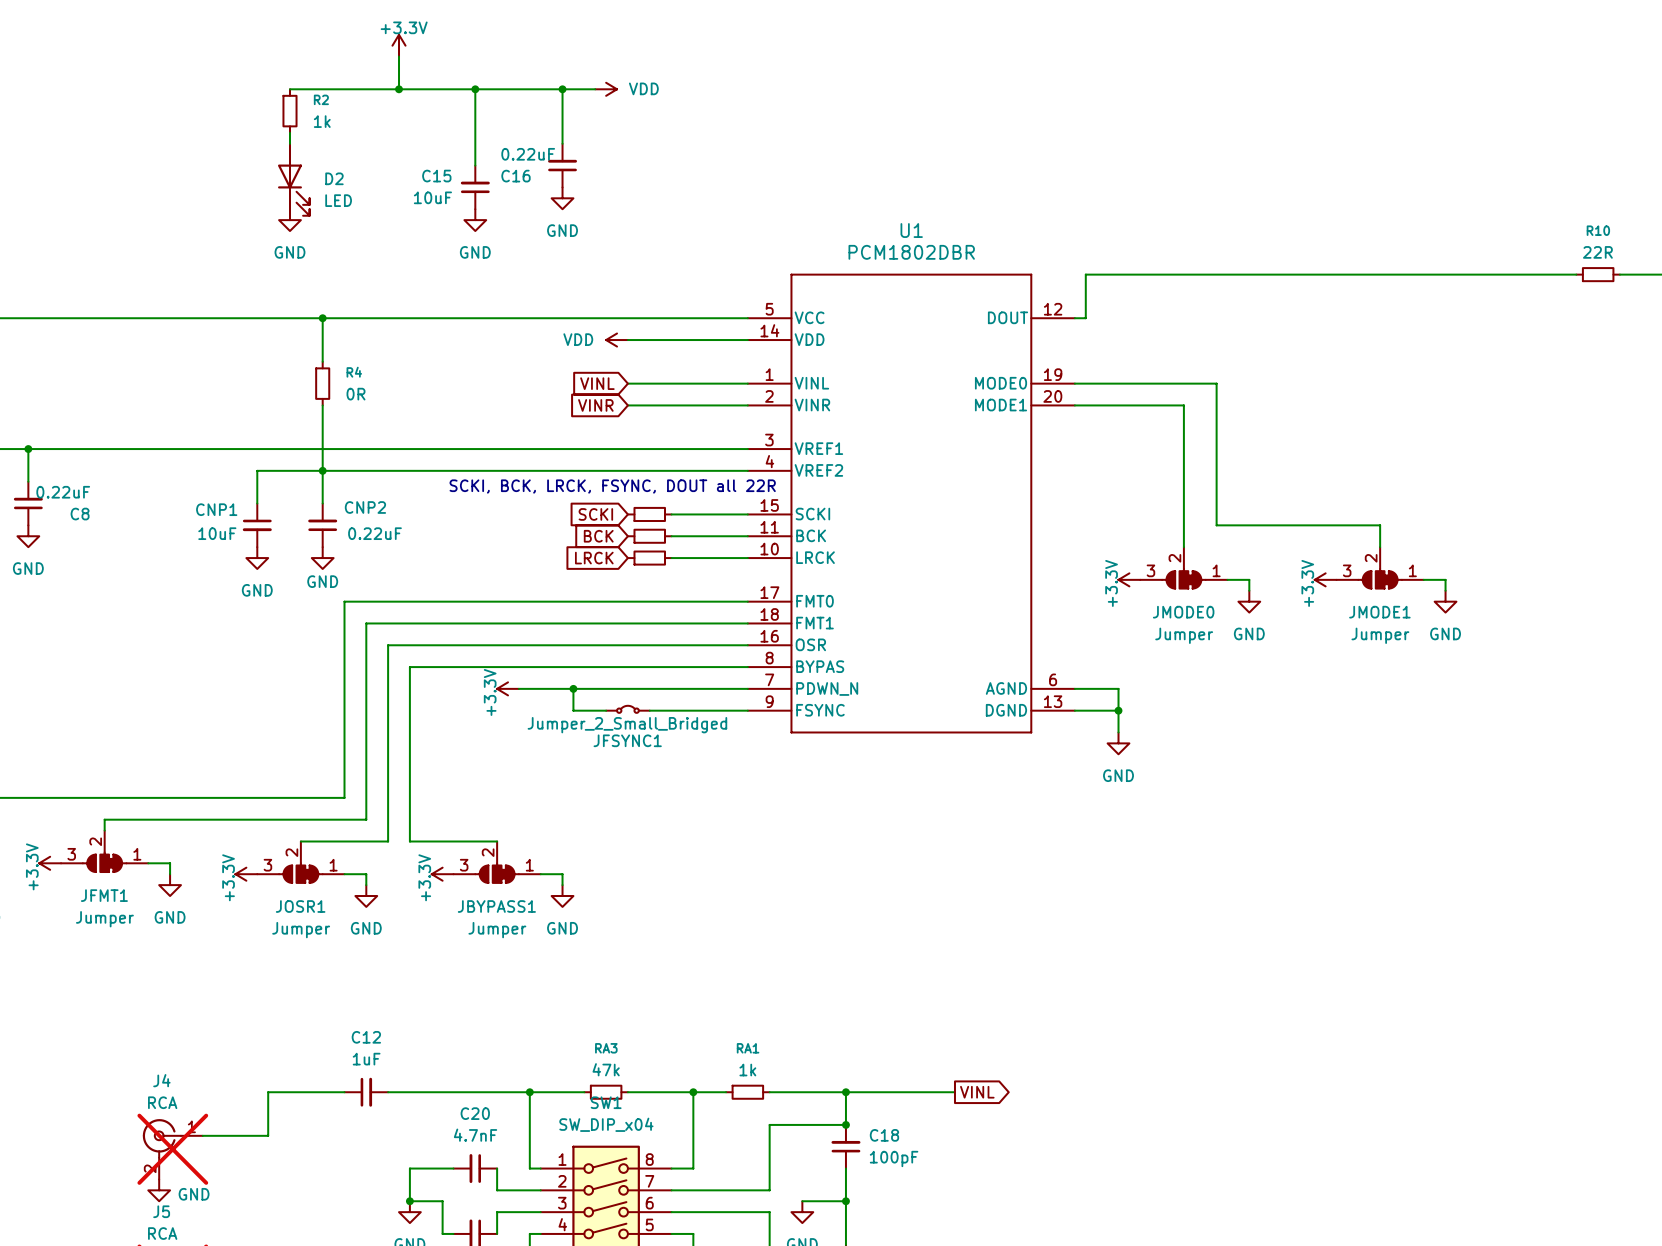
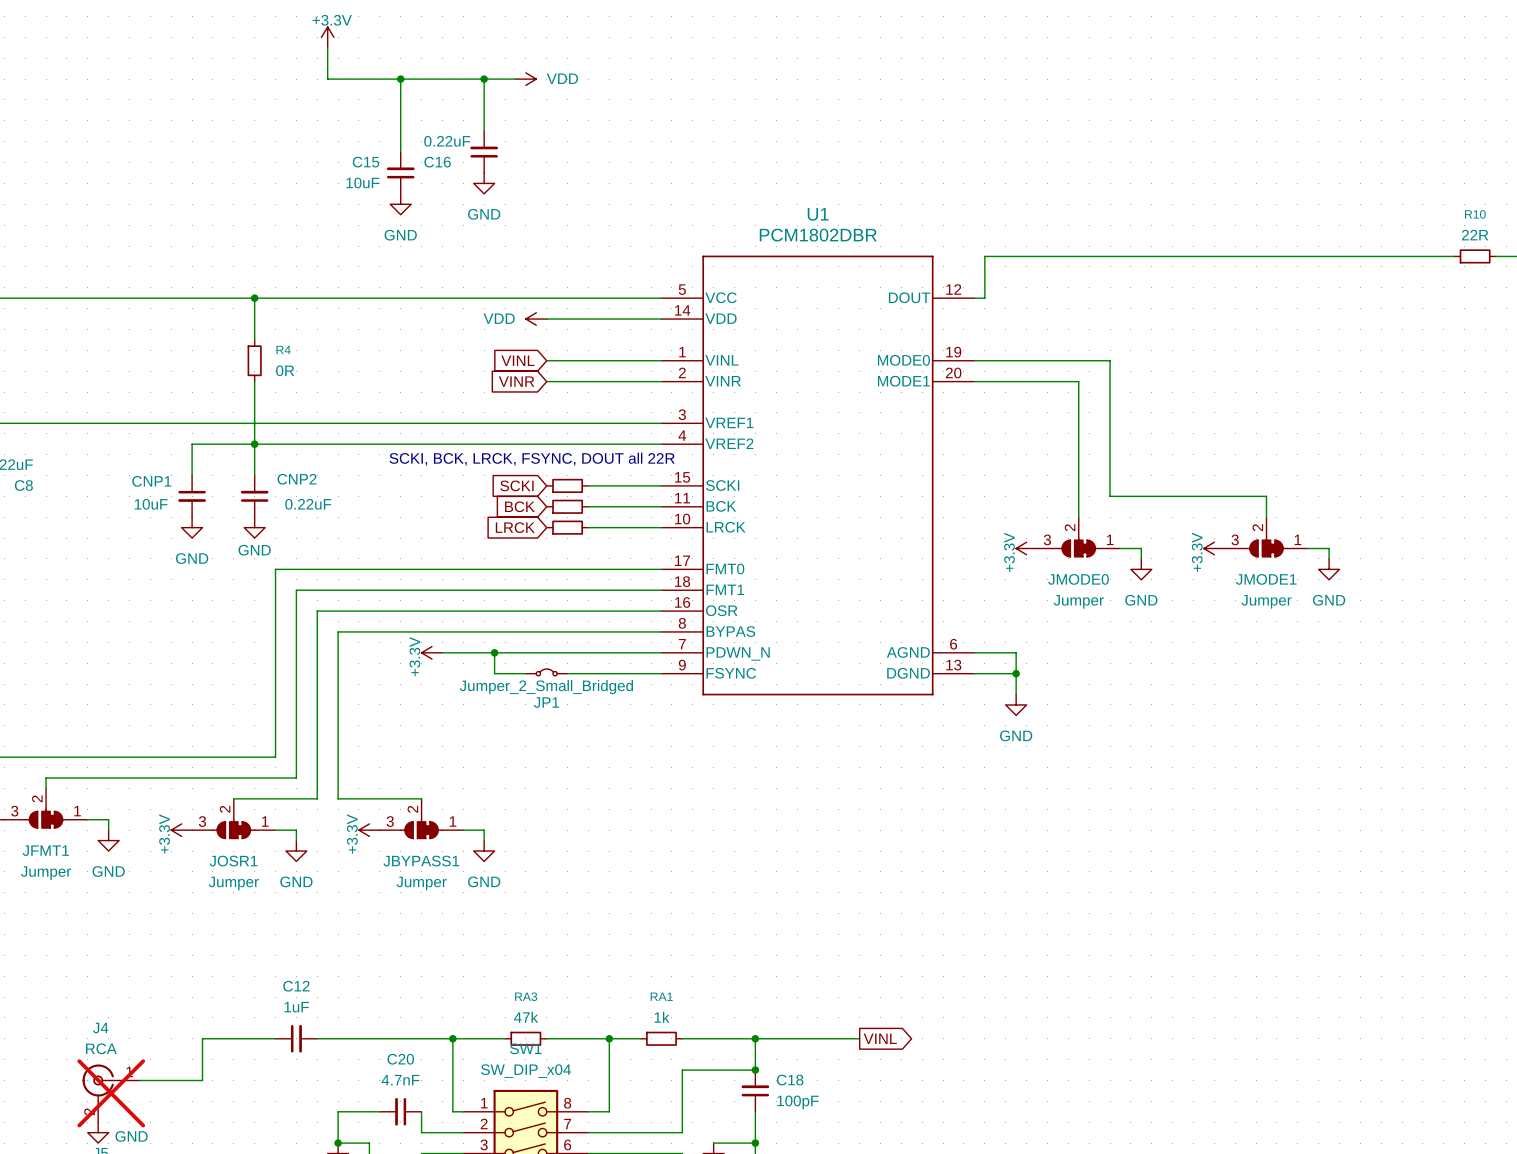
wire: (289, 89) (399, 89) -> none
junction: (399, 89) -> none
R2: 1k (289, 111) -> none
wire: (289, 132) (289, 143) -> none
D2: LED (293, 179) -> none
power symbol: GND (289, 220) -> none
JFSYNC1 name: JFSYNC1 (627, 740) -> JP1 (546, 702)

